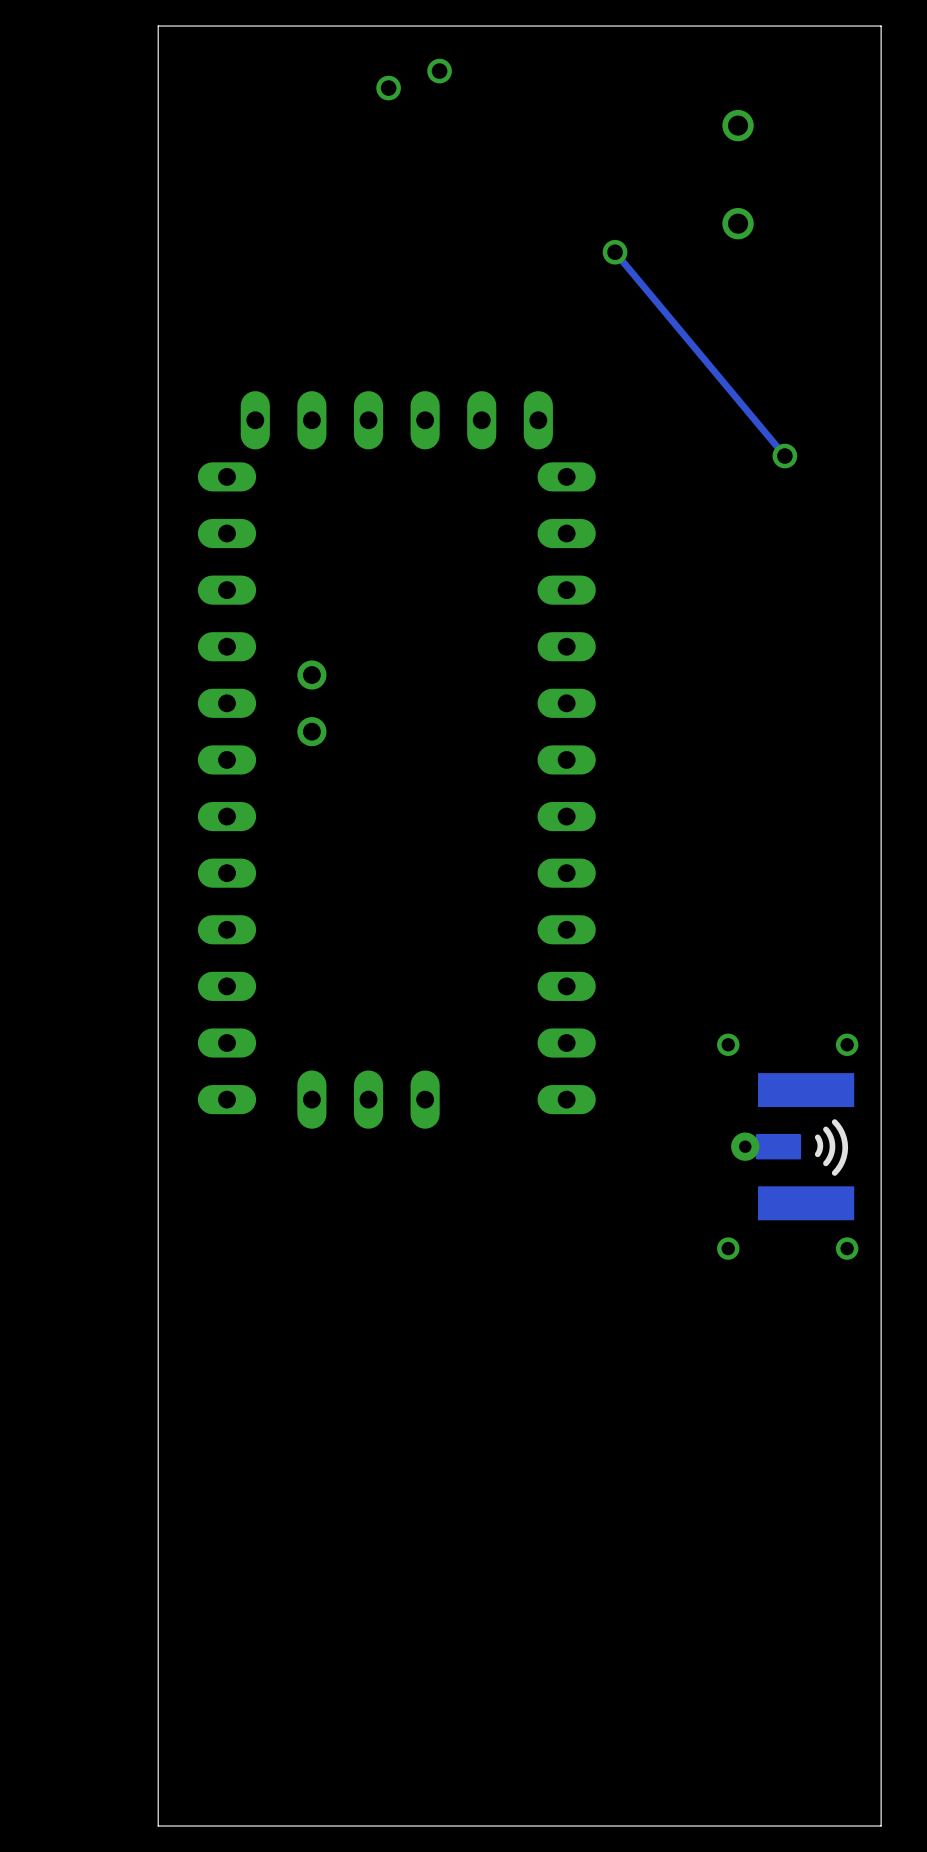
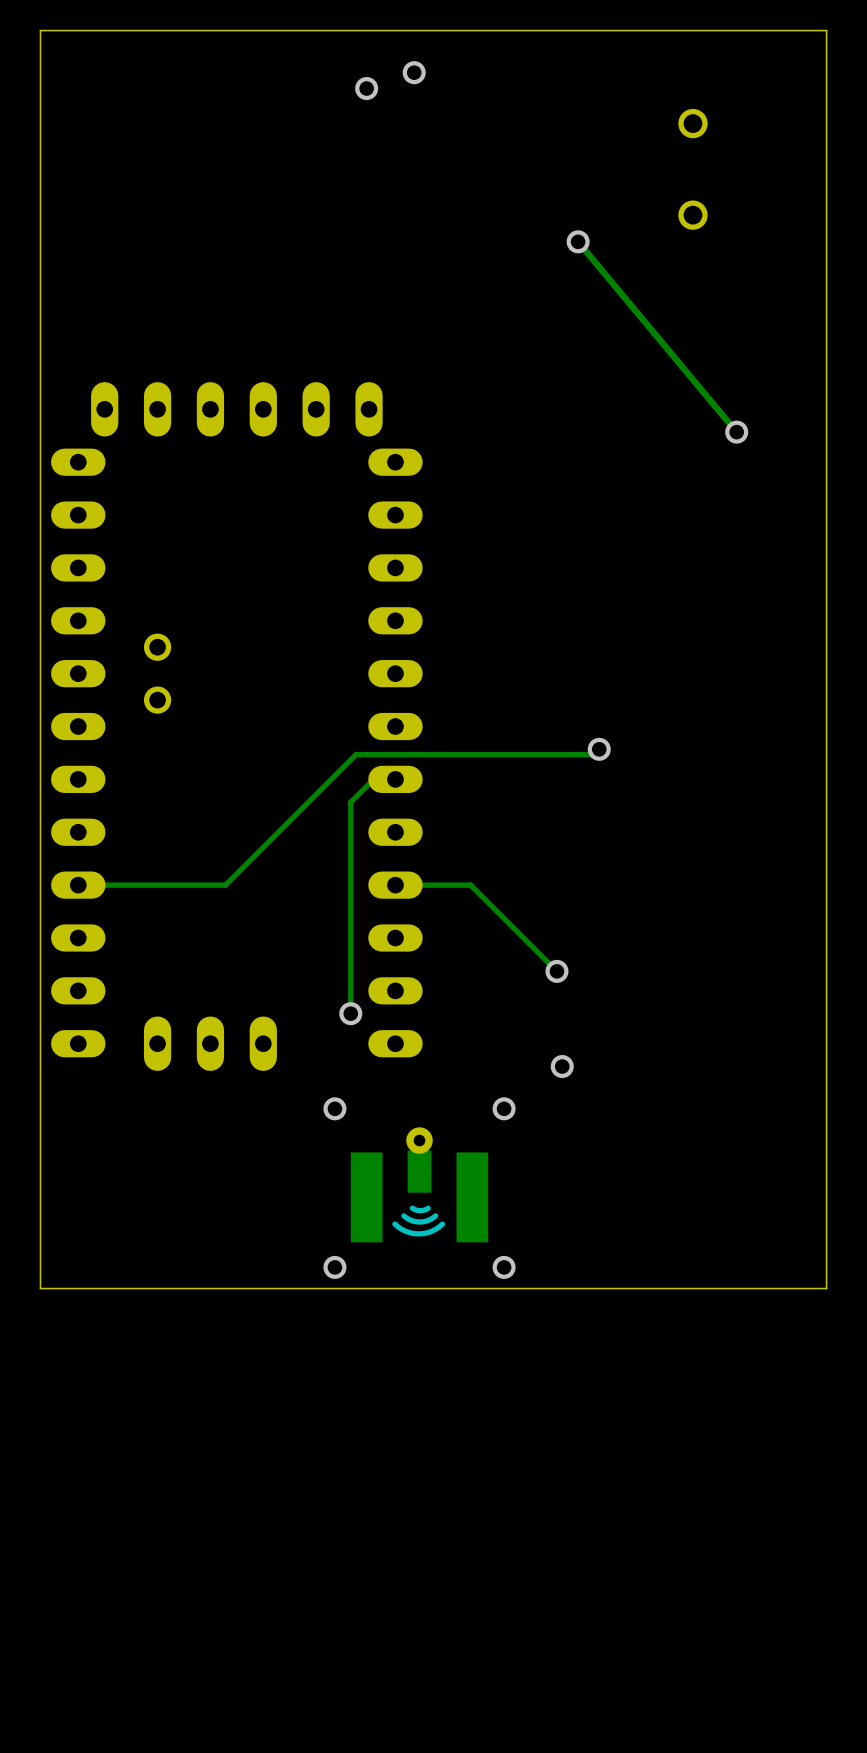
board edge: (158, 26) (158, 1826) (881, 1826) (881, 1373) -> (151, 30) (40, 30) (40, 1288) (826, 1288)
part position: (396, 759) -> (236, 726)
track: none -> (599, 749) (593, 754) (356, 754) (225, 885) (78, 885)
via: none -> (599, 749)
track: none -> (395, 779) (373, 779) (350, 802) (350, 1013)
track: none -> (395, 885) (470, 885) (556, 971)
via: none -> (556, 971)
via: (728, 1044) -> none
via: (847, 1044) -> none
via: none -> (350, 1013)
via: none -> (562, 1066)
part rotation: 0° (792, 1146) -> 90° clockwise (419, 1184)
part position: (792, 1146) -> (419, 1184)
via: none -> (334, 1108)
via: none -> (504, 1108)
via: (728, 1248) -> none
via: (847, 1248) -> none
via: none -> (334, 1267)
via: none -> (504, 1267)

